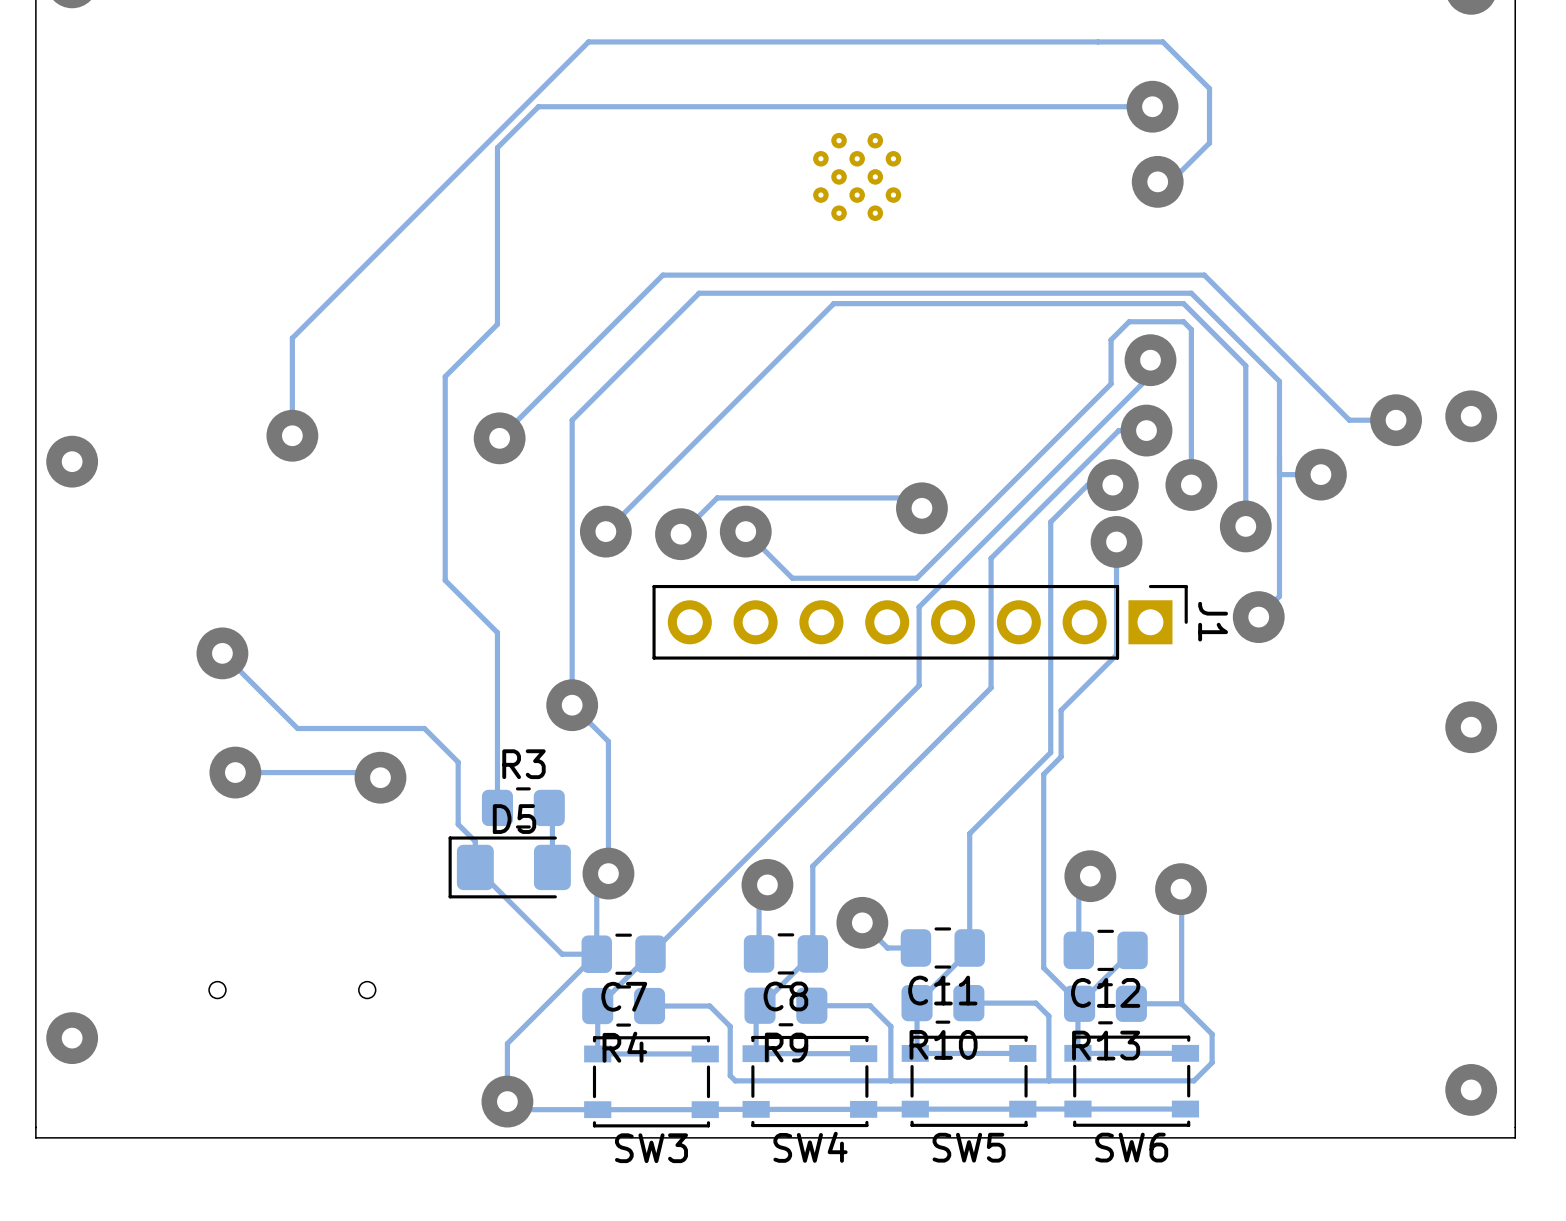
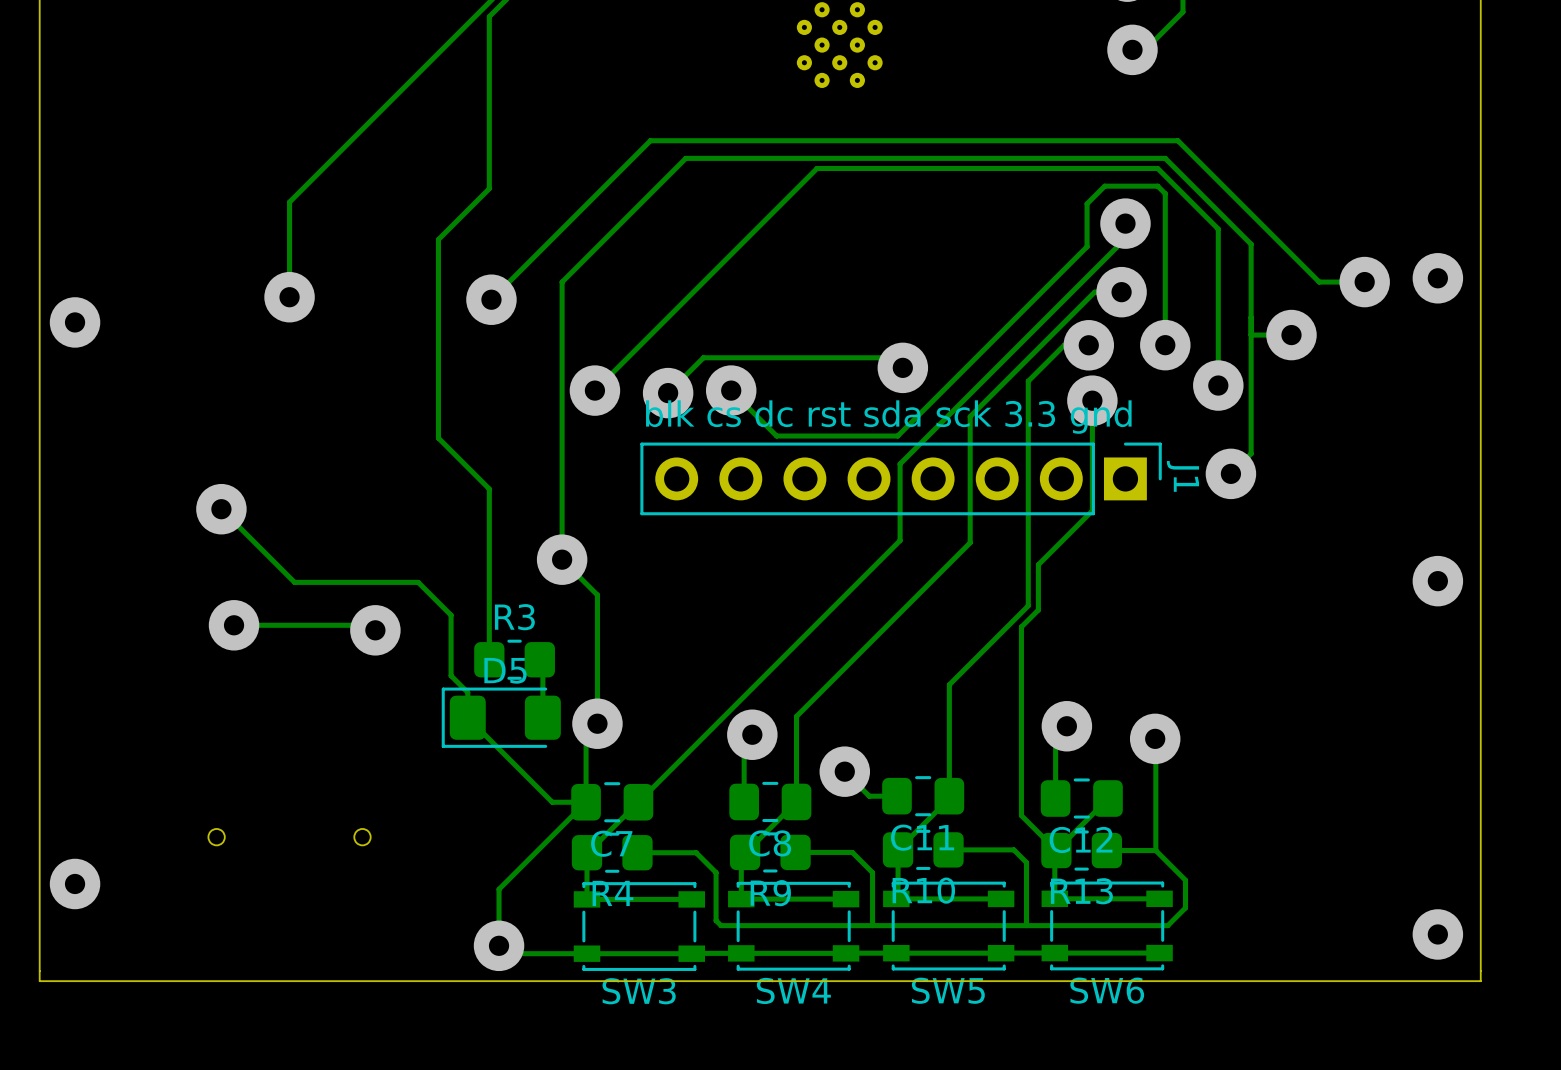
text: none -> blk cs dc rst sda sck 3.3 gnd (888, 417)

